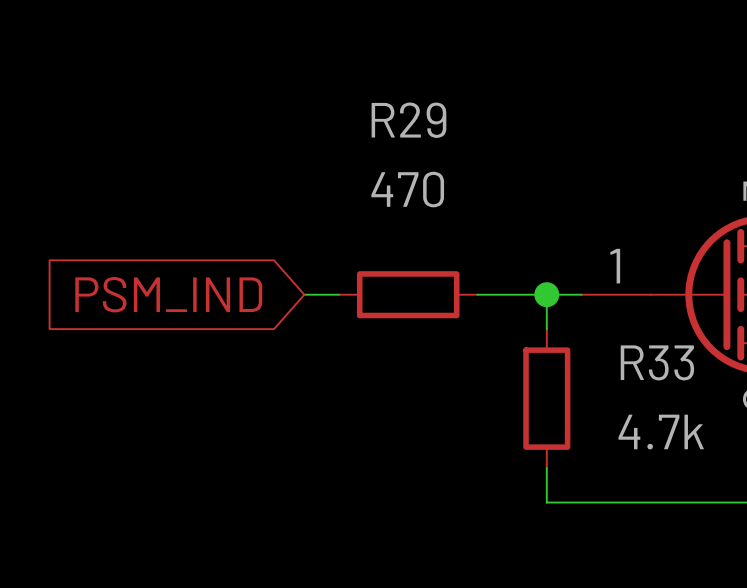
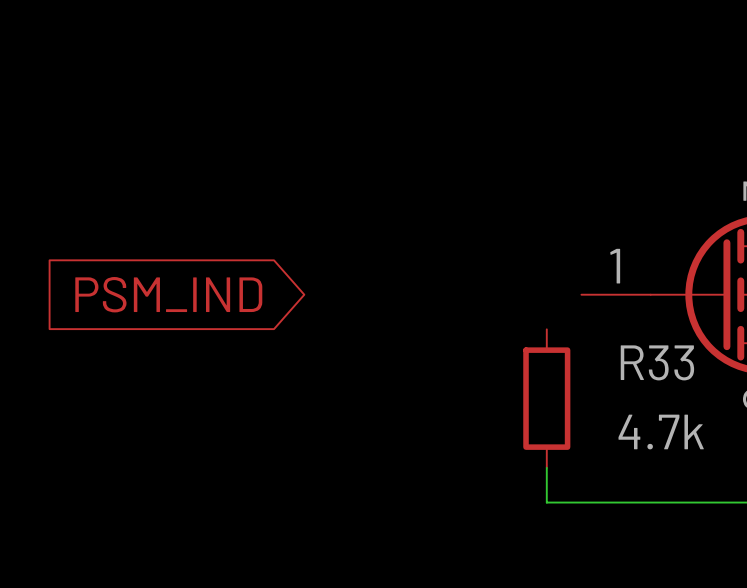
wire: (304, 294) (338, 294) -> none
R29: 470 (408, 294) -> none
wire: (477, 294) (581, 294) -> none
wire: (546, 294) (546, 329) -> none
junction: (546, 294) -> none

